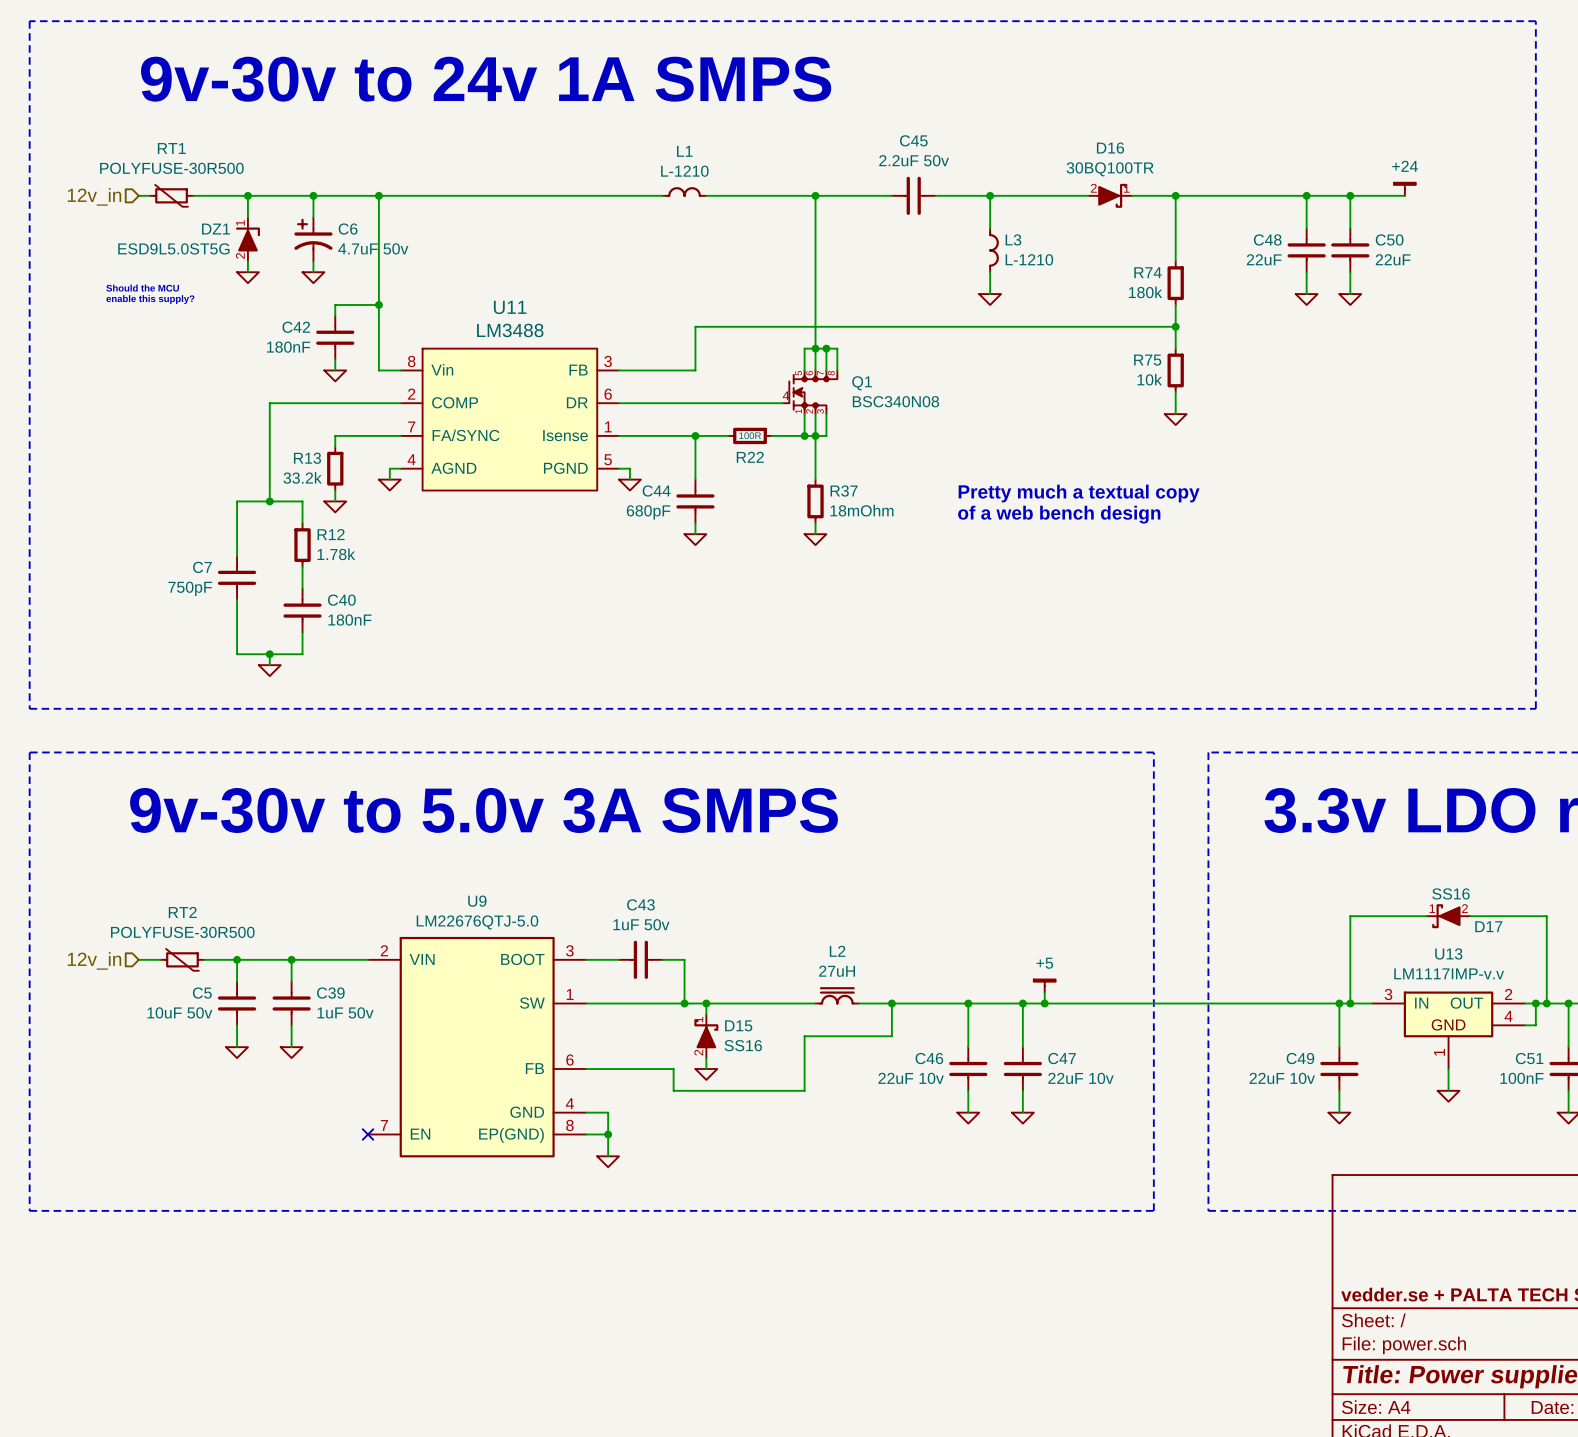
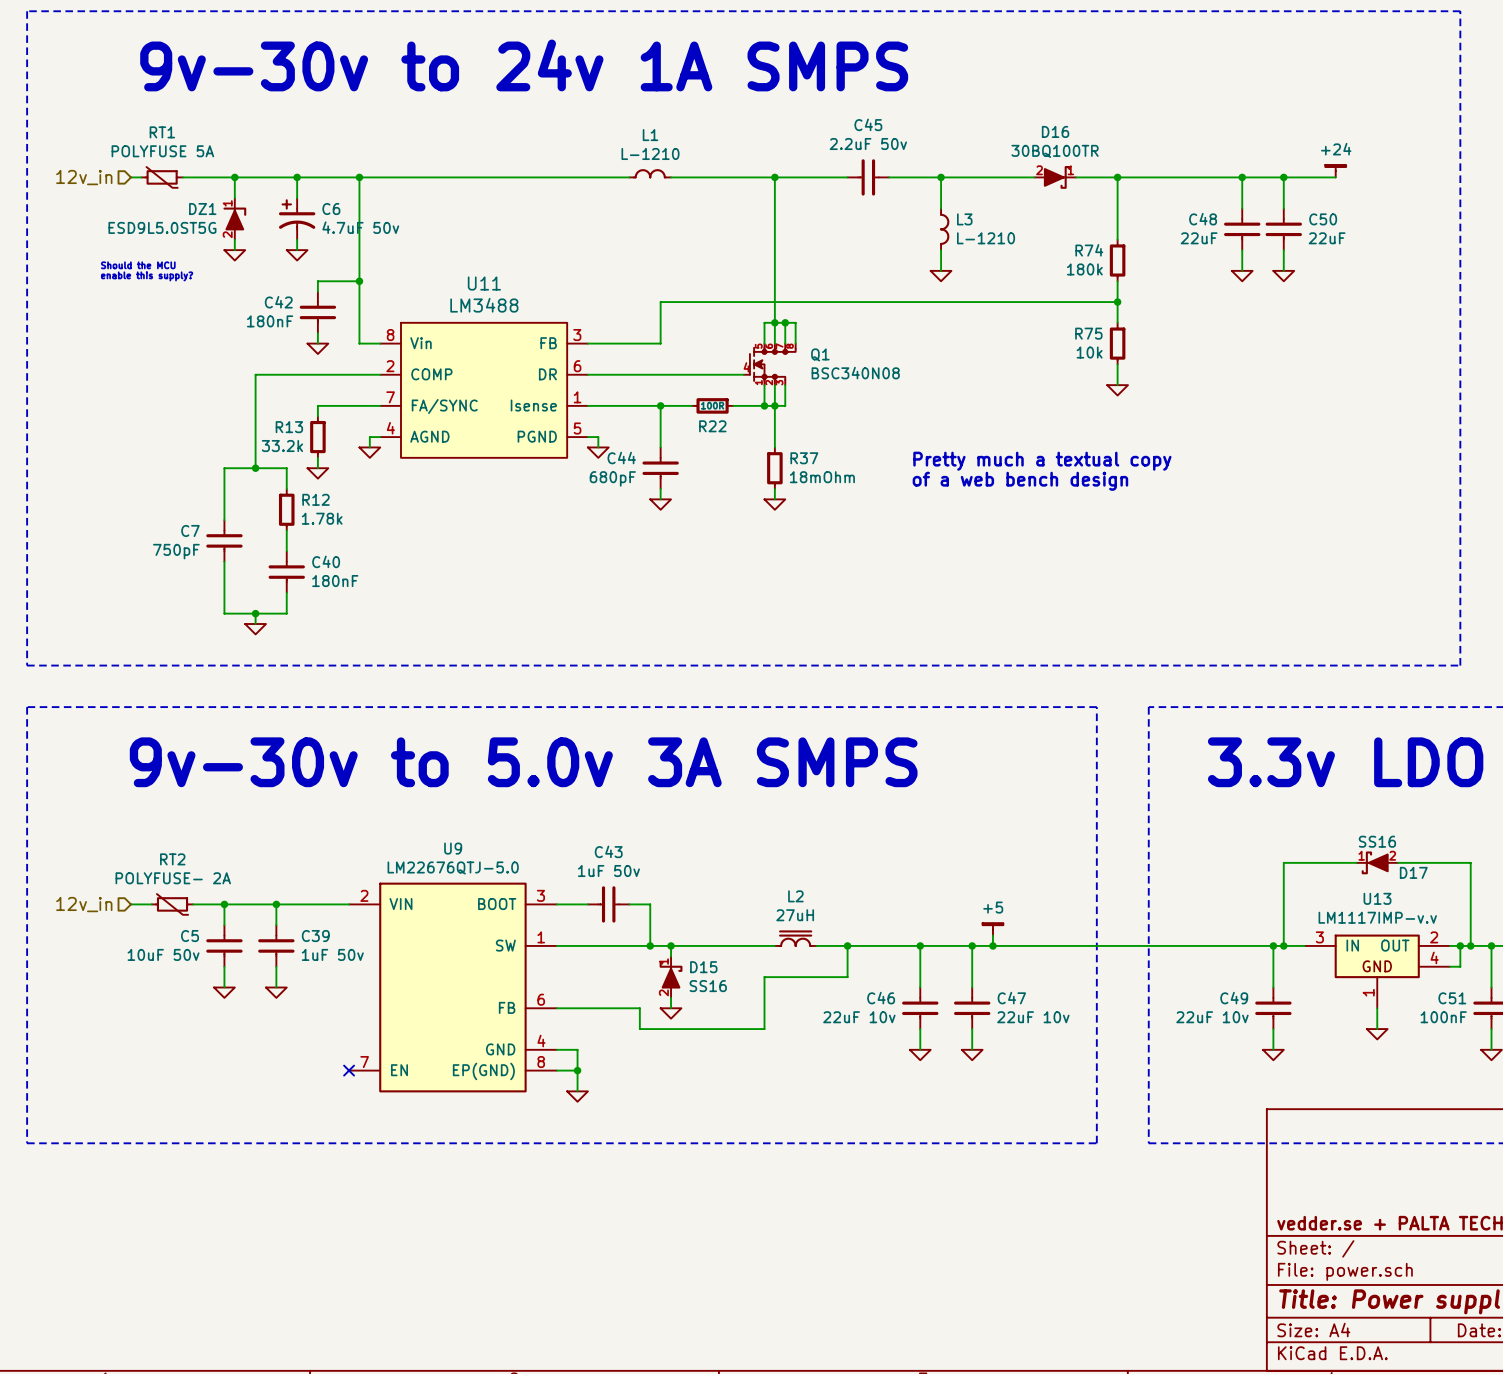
RT1 value: POLYFUSE-30R500 (171, 168) -> POLYFUSE 5A (162, 151)
RT2 value: POLYFUSE-30R500 (182, 932) -> POLYFUSE- 2A (173, 878)

